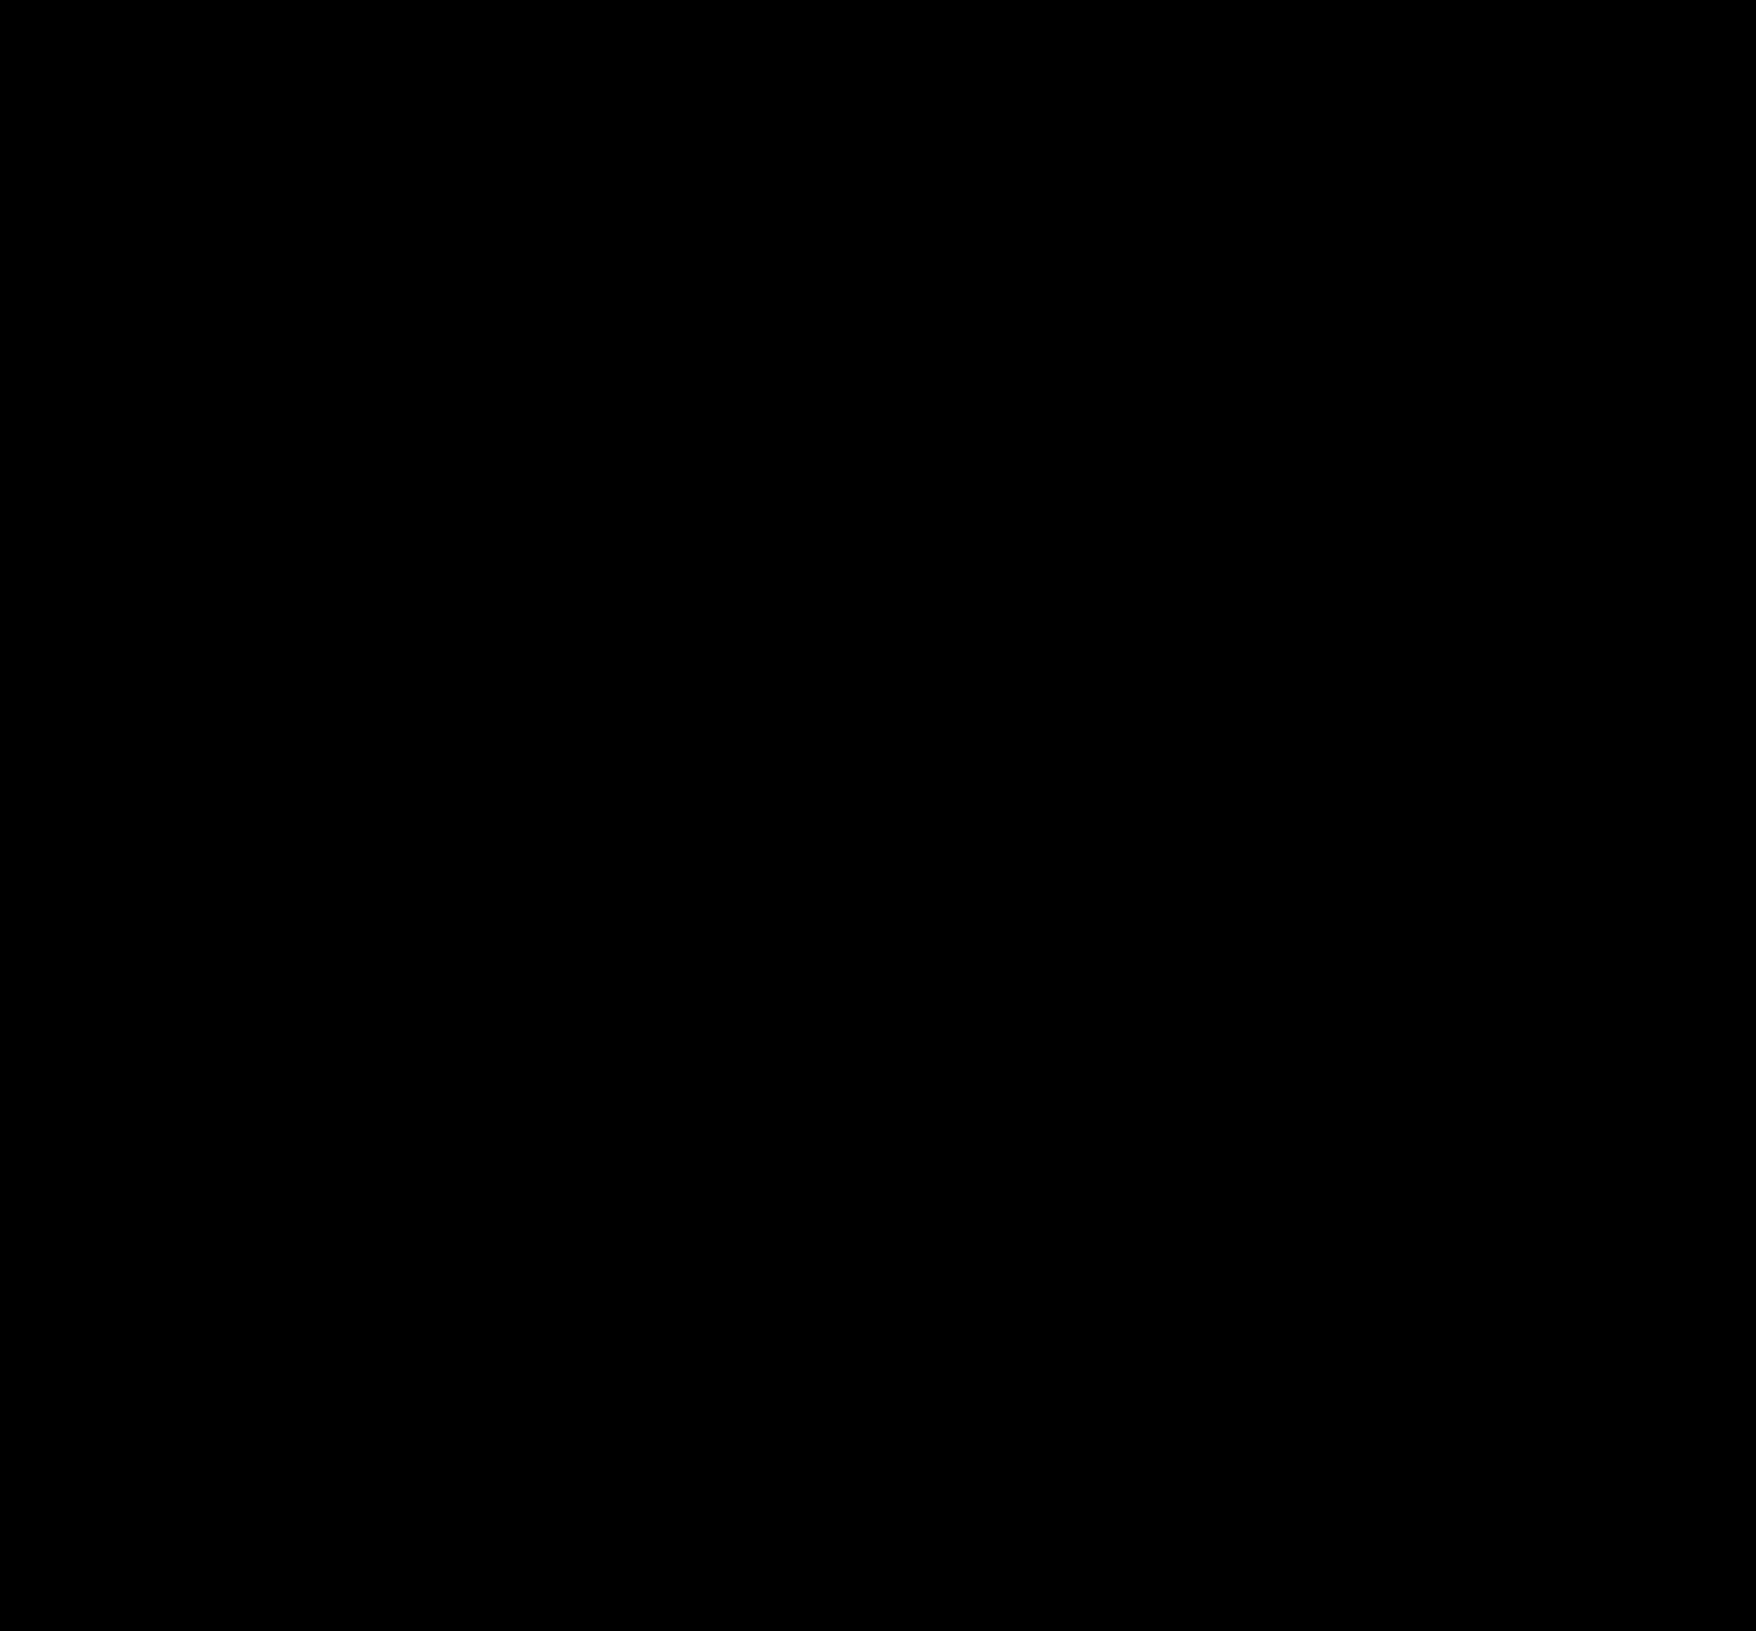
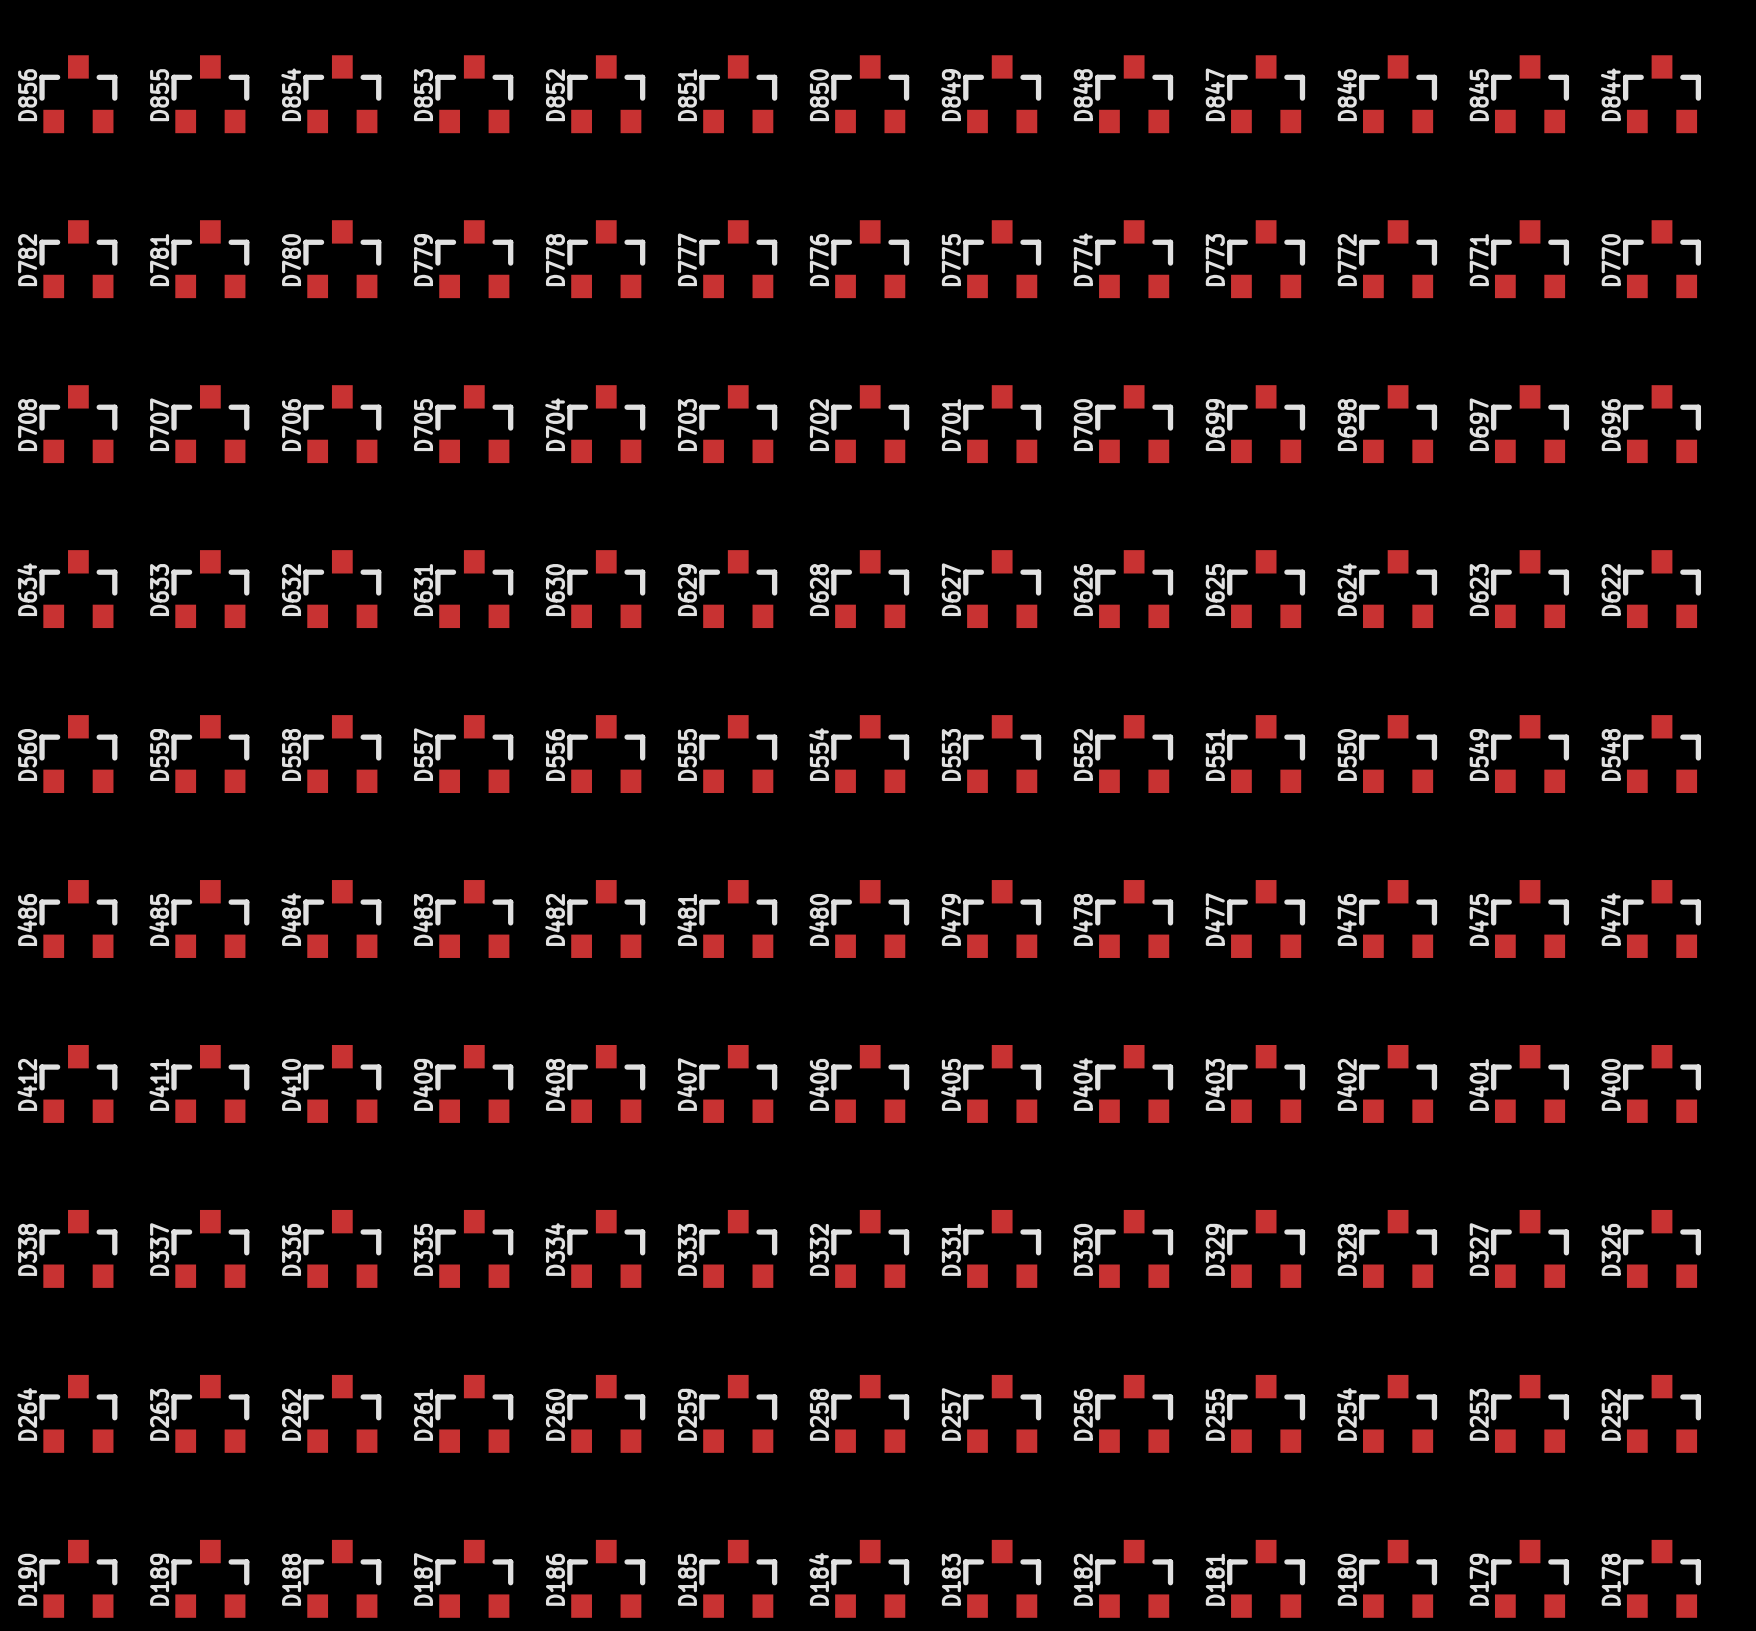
D856: none -> (78, 94)
D855: none -> (210, 94)
D854: none -> (342, 94)
D853: none -> (474, 94)
D852: none -> (606, 94)
D851: none -> (738, 94)
D850: none -> (870, 94)
D849: none -> (1002, 94)
D848: none -> (1134, 94)
D847: none -> (1266, 94)
D846: none -> (1398, 94)
D845: none -> (1530, 94)
D844: none -> (1662, 94)
D782: none -> (78, 259)
D781: none -> (210, 259)
D780: none -> (342, 259)
D779: none -> (474, 259)
D778: none -> (606, 259)
D777: none -> (738, 259)
D776: none -> (870, 259)
D775: none -> (1002, 259)
D774: none -> (1134, 259)
D773: none -> (1266, 259)
D772: none -> (1398, 259)
D771: none -> (1530, 259)
D770: none -> (1662, 259)
D708: none -> (78, 424)
D707: none -> (210, 424)
D706: none -> (342, 424)
D705: none -> (474, 424)
D704: none -> (606, 424)
D703: none -> (738, 424)
D702: none -> (870, 424)
D701: none -> (1002, 424)
D700: none -> (1134, 424)
D699: none -> (1266, 424)
D698: none -> (1398, 424)
D697: none -> (1530, 424)
D696: none -> (1662, 424)
D634: none -> (78, 589)
D633: none -> (210, 589)
D632: none -> (342, 589)
D631: none -> (474, 589)
D630: none -> (606, 589)
D629: none -> (738, 589)
D628: none -> (870, 589)
D627: none -> (1002, 589)
D626: none -> (1134, 589)
D625: none -> (1266, 589)
D624: none -> (1398, 589)
D623: none -> (1530, 589)
D622: none -> (1662, 589)
D560: none -> (78, 754)
D559: none -> (210, 754)
D558: none -> (342, 754)
D557: none -> (474, 754)
D556: none -> (606, 754)
D555: none -> (738, 754)
D554: none -> (870, 754)
D553: none -> (1002, 754)
D552: none -> (1134, 754)
D551: none -> (1266, 754)
D550: none -> (1398, 754)
D549: none -> (1530, 754)
D548: none -> (1662, 754)
D486: none -> (78, 919)
D485: none -> (210, 919)
D484: none -> (342, 919)
D483: none -> (474, 919)
D482: none -> (606, 919)
D481: none -> (738, 919)
D480: none -> (870, 919)
D479: none -> (1002, 919)
D478: none -> (1134, 919)
D477: none -> (1266, 919)
D476: none -> (1398, 919)
D475: none -> (1530, 919)
D474: none -> (1662, 919)
D412: none -> (78, 1083)
D411: none -> (210, 1083)
D410: none -> (342, 1083)
D409: none -> (474, 1083)
D408: none -> (606, 1083)
D407: none -> (738, 1083)
D406: none -> (870, 1083)
D405: none -> (1002, 1083)
D404: none -> (1134, 1083)
D403: none -> (1266, 1083)
D402: none -> (1398, 1083)
D401: none -> (1530, 1083)
D400: none -> (1662, 1083)
D338: none -> (78, 1248)
D337: none -> (210, 1248)
D336: none -> (342, 1248)
D335: none -> (474, 1248)
D334: none -> (606, 1248)
D333: none -> (738, 1248)
D332: none -> (870, 1248)
D331: none -> (1002, 1248)
D330: none -> (1134, 1248)
D329: none -> (1266, 1248)
D328: none -> (1398, 1248)
D327: none -> (1530, 1248)
D326: none -> (1662, 1248)
D264: none -> (78, 1413)
D263: none -> (210, 1413)
D262: none -> (342, 1413)
D261: none -> (474, 1413)
D260: none -> (606, 1413)
D259: none -> (738, 1413)
D258: none -> (870, 1413)
D257: none -> (1002, 1413)
D256: none -> (1134, 1413)
D255: none -> (1266, 1413)
D254: none -> (1398, 1413)
D253: none -> (1530, 1413)
D252: none -> (1662, 1413)
D190: none -> (78, 1578)
D189: none -> (210, 1578)
D188: none -> (342, 1578)
D187: none -> (474, 1578)
D186: none -> (606, 1578)
D185: none -> (738, 1578)
D184: none -> (870, 1578)
D183: none -> (1002, 1578)
D182: none -> (1134, 1578)
D181: none -> (1266, 1578)
D180: none -> (1398, 1578)
D179: none -> (1530, 1578)
D178: none -> (1662, 1578)

